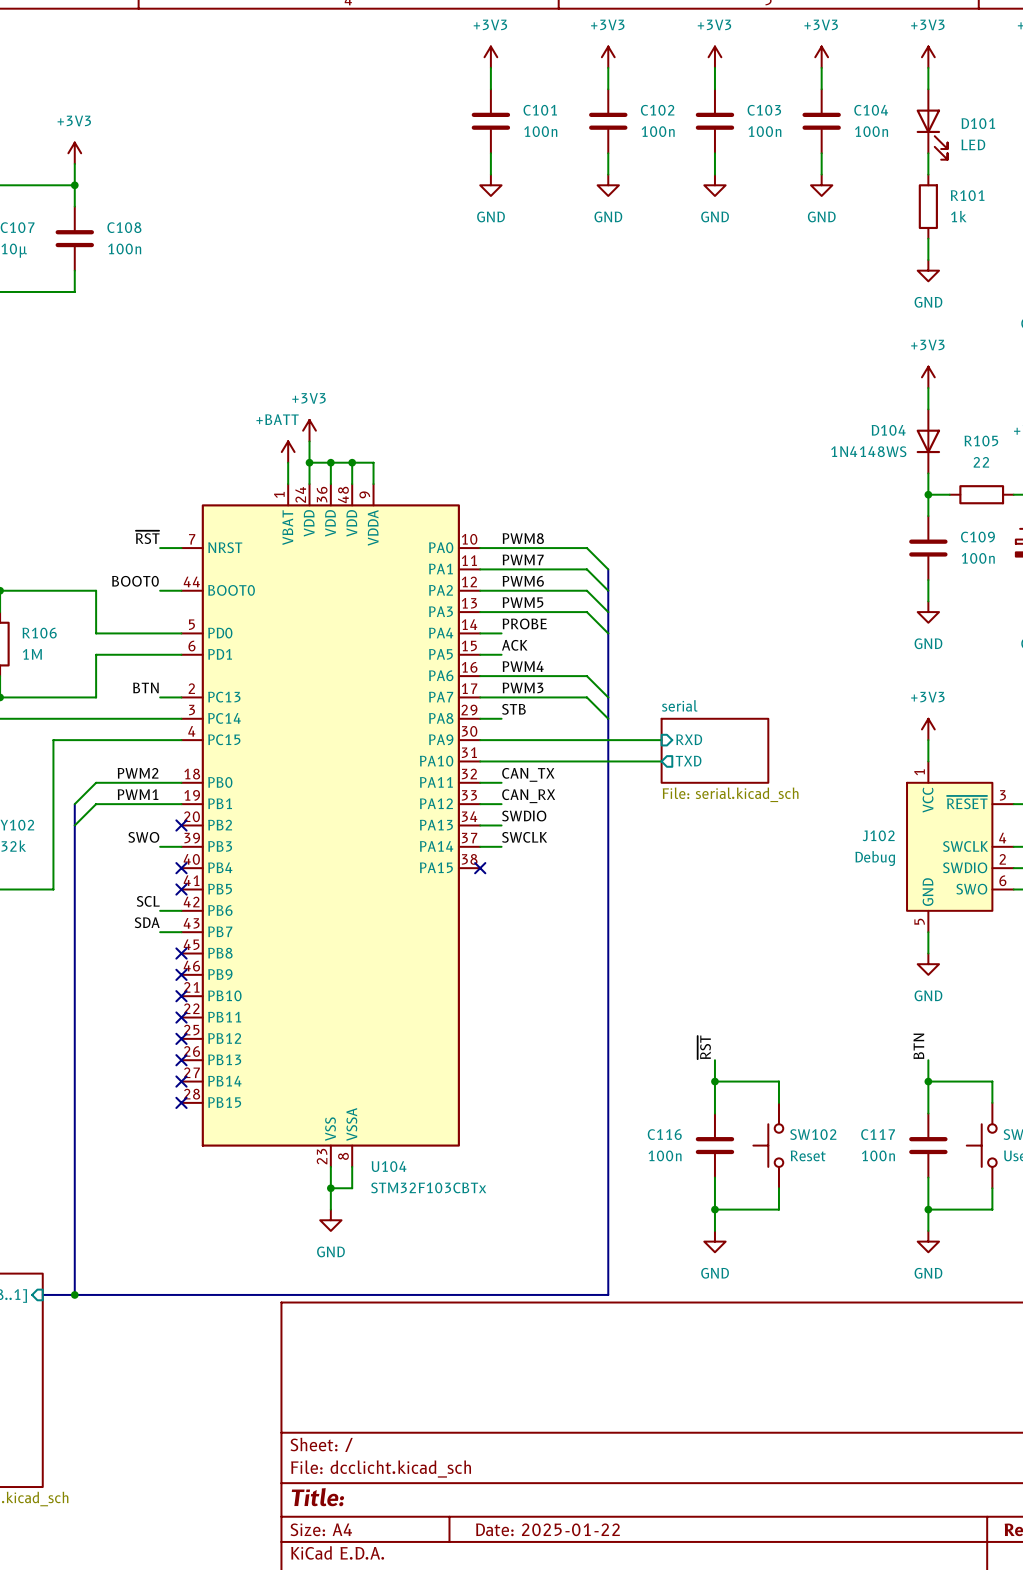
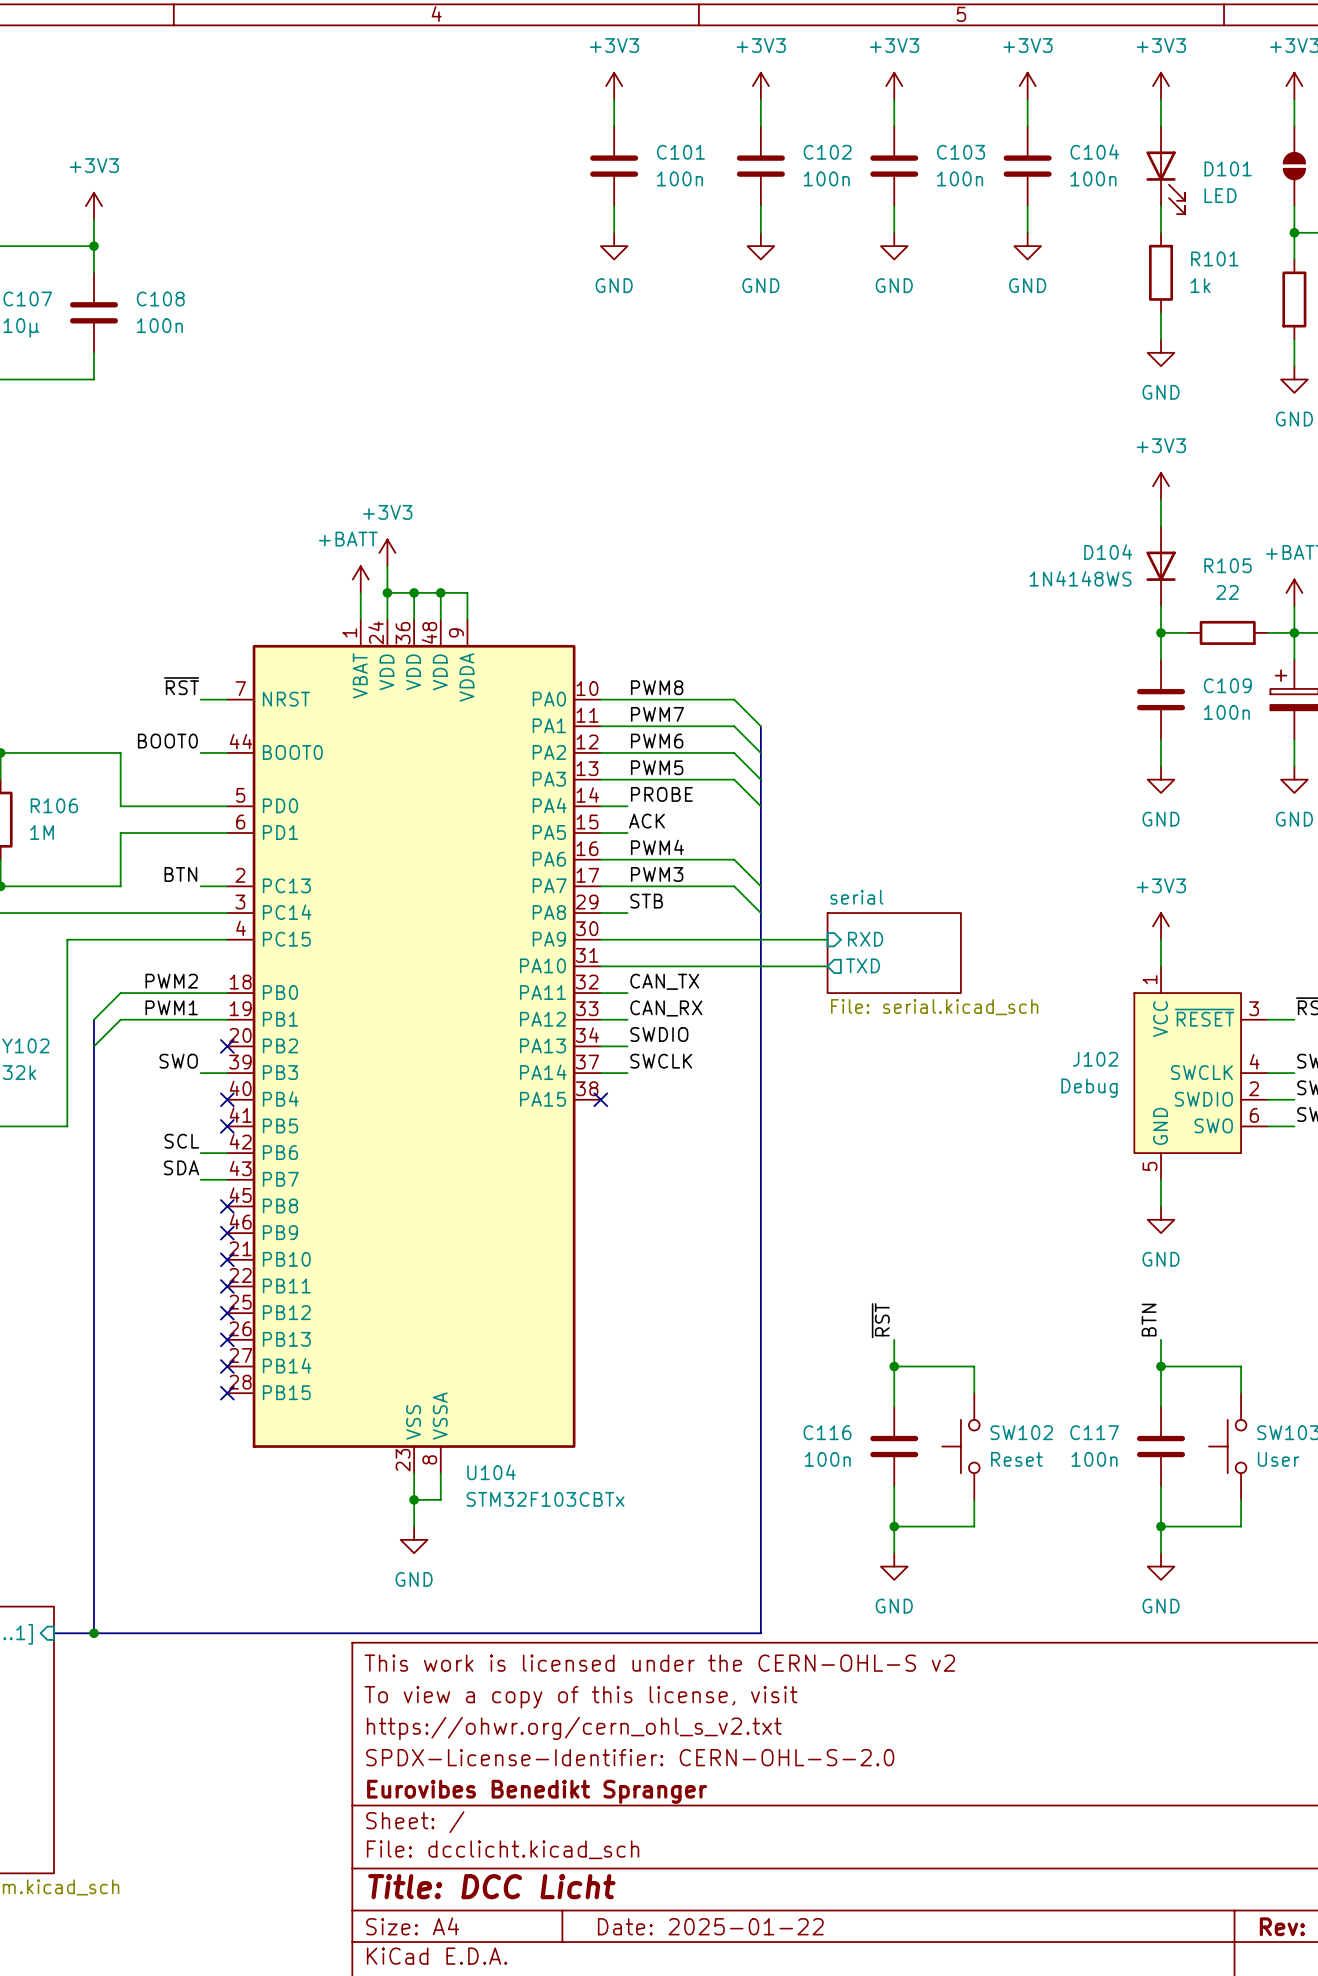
title block: none -> This work is licensed under the CERN-OHL-S v2 (659, 1663)
title block: none -> To view a copy of this license, visit (581, 1697)
title block: none -> https://ohwr.org/cern_ohl_s_v2.txt (574, 1728)
title block: none -> SPDX-License-Identifier: CERN-OHL-S-2.0 (630, 1757)
title block: none -> Eurovibes Benedikt Spranger (537, 1791)
title block: Title: (317, 1497) -> Title: DCC Licht (491, 1886)

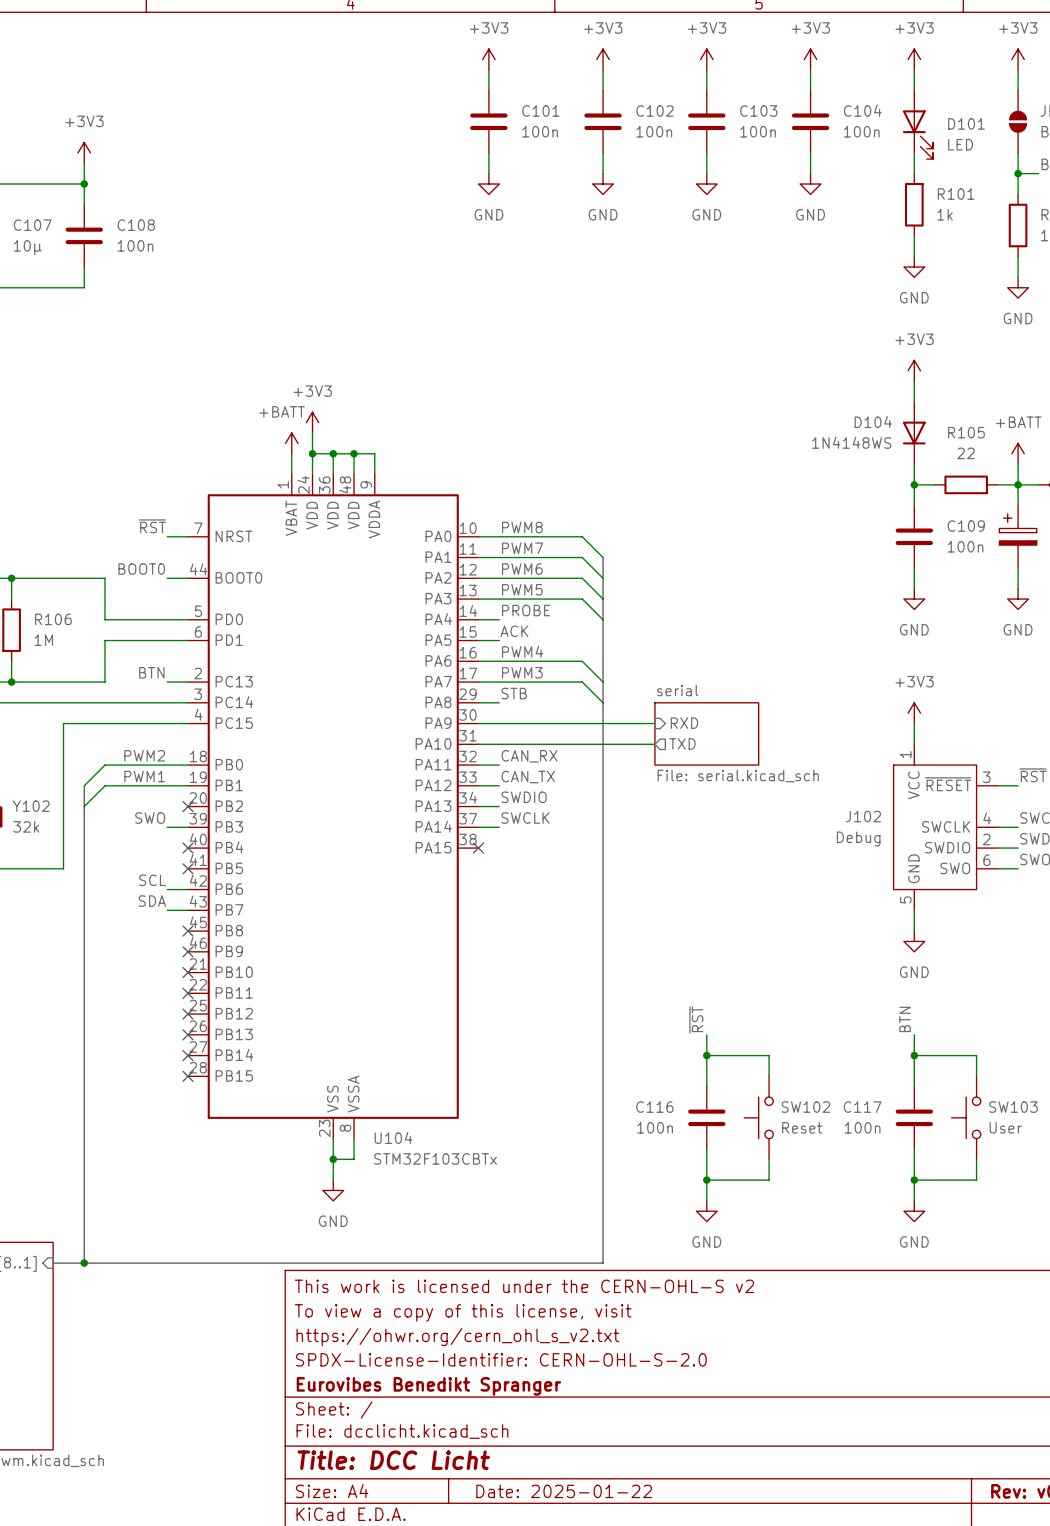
label: CAN_TX (664, 981) -> CAN_RX (529, 756)
label: CAN_RX (666, 1008) -> CAN_TX (528, 777)

